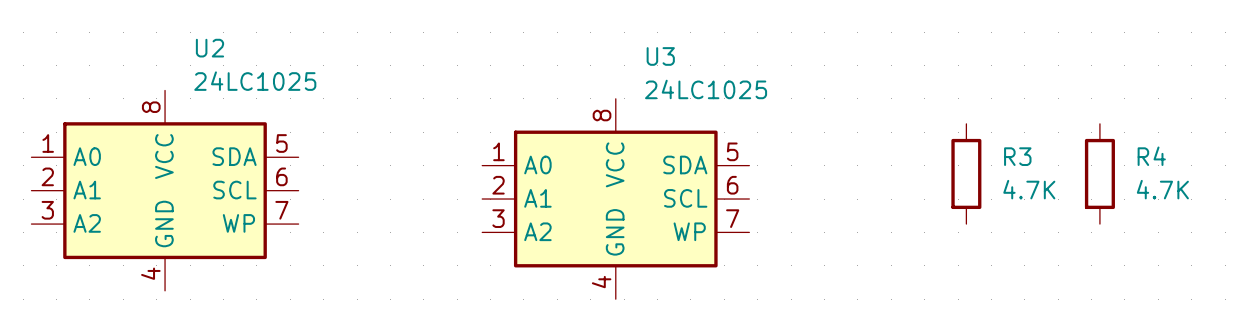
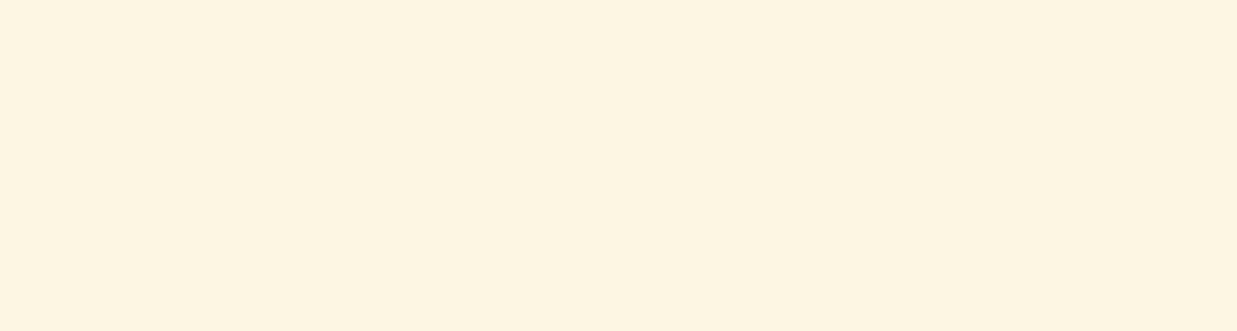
R3: 4.7K (966, 173) -> none
R4: 4.7K (1099, 173) -> none
U2: 24LC1025 (165, 190) -> none
U3: 24LC1025 (615, 199) -> none

